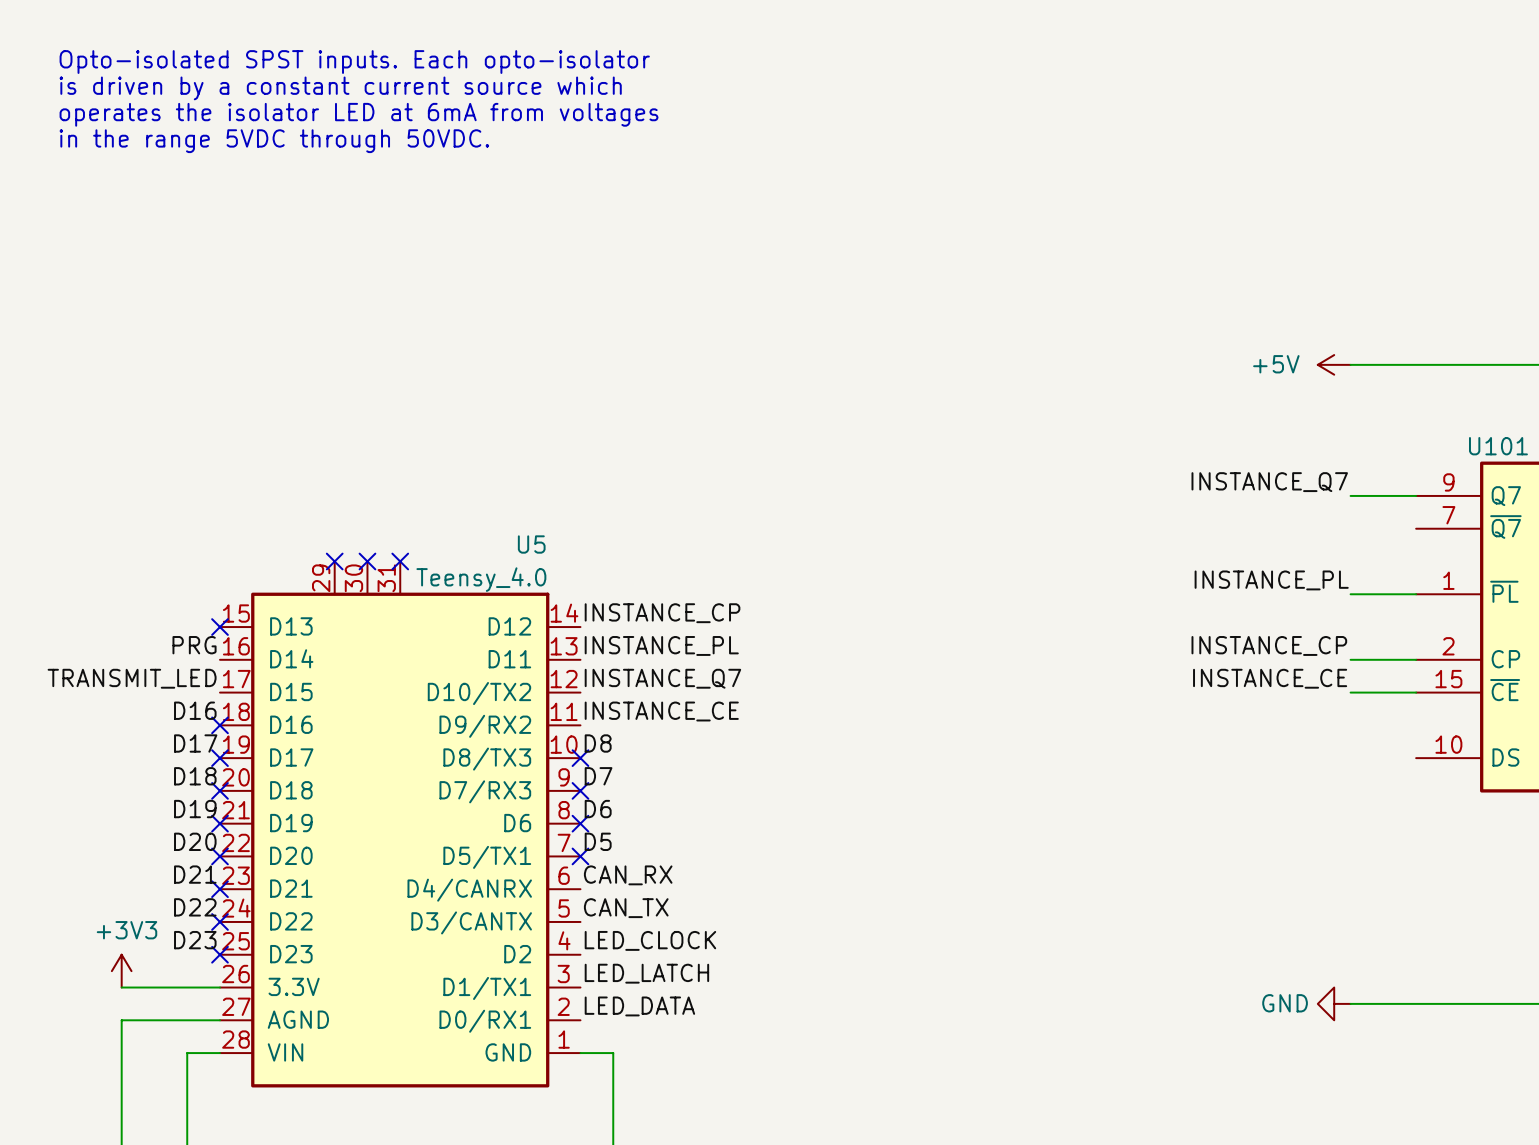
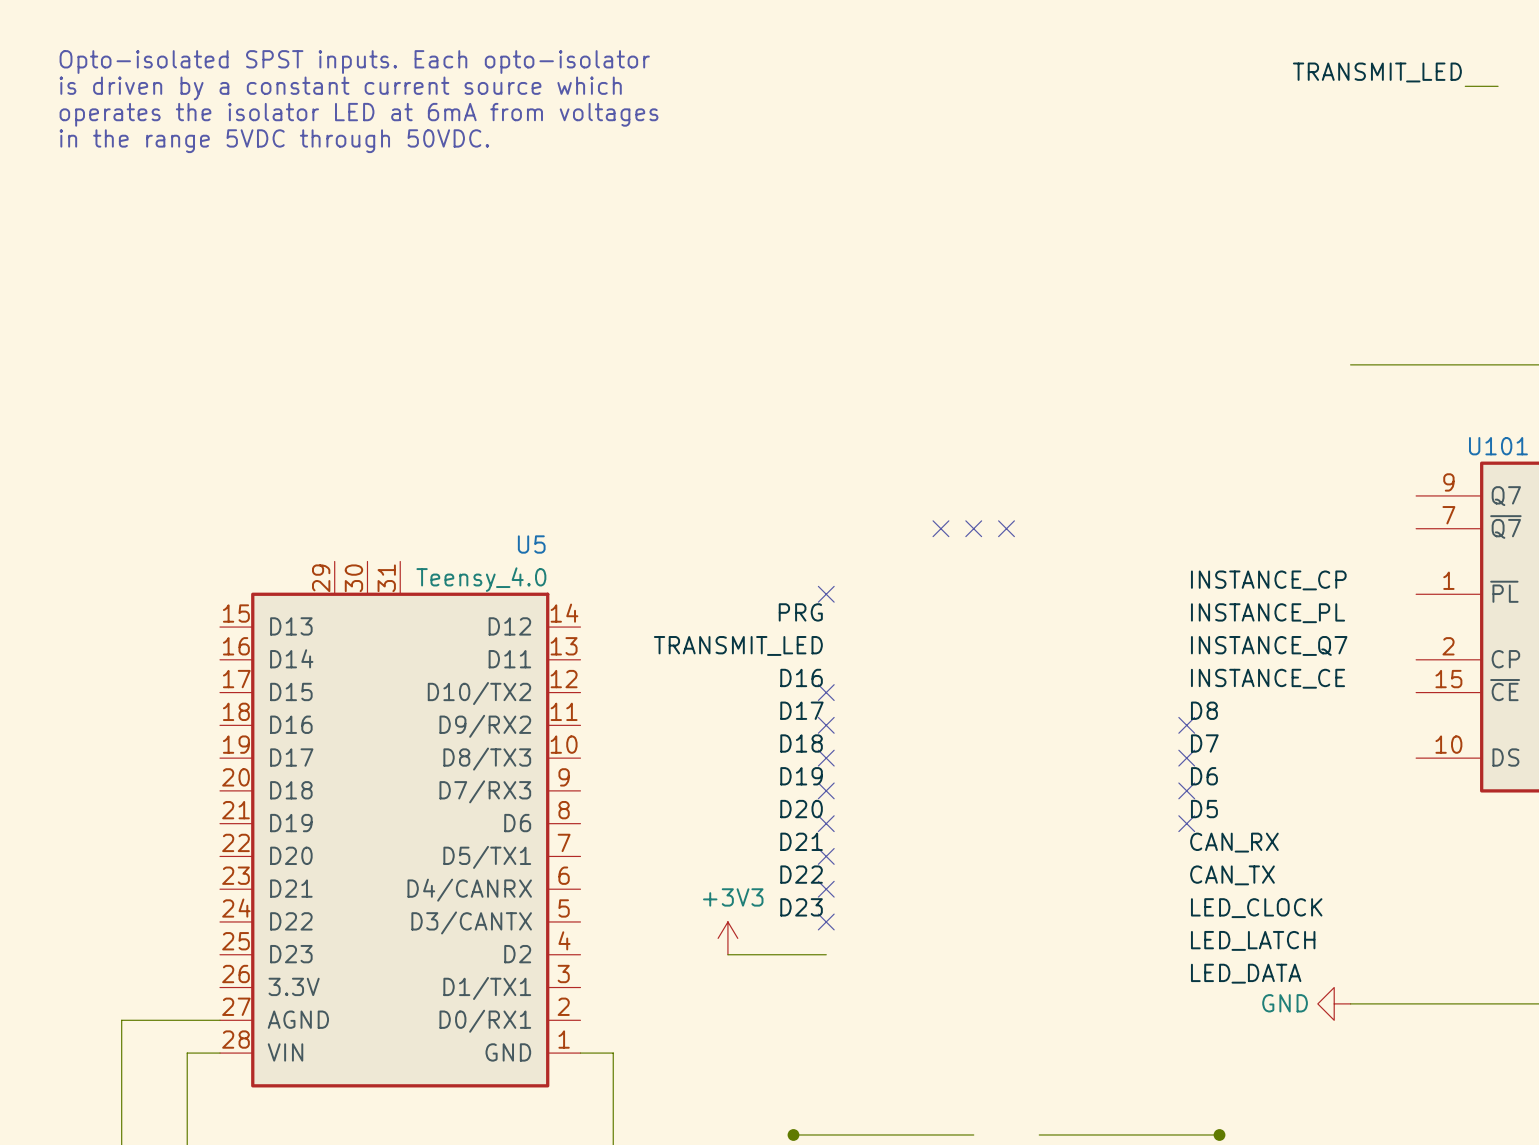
label: none -> TRANSMIT_LED (1377, 72)
wire: none -> (1465, 86) (1498, 86)
power symbol: +5V (1334, 364) -> none
label position: INSTANCE_Q7 (1269, 482) -> INSTANCE_Q7 (1269, 645)
wire: (1350, 495) (1416, 495) -> none
no-connect mark: none -> (940, 528)
no-connect mark: none -> (973, 528)
no-connect mark: none -> (1006, 528)
no-connect mark: (334, 561) -> none
no-connect mark: (367, 561) -> none
no-connect mark: (400, 561) -> none
label position: INSTANCE_PL (1271, 580) -> INSTANCE_PL (1268, 613)
no-connect mark: none -> (826, 594)
wire: (1350, 594) (1416, 594) -> none
label: none -> PRG (800, 612)
label: INSTANCE_CP (662, 613) -> none
no-connect mark: (220, 627) -> none
label: PRG (194, 645) -> none
label: INSTANCE_PL (661, 645) -> none
label: none -> TRANSMIT_LED (738, 645)
label position: INSTANCE_CP (1269, 645) -> INSTANCE_CP (1268, 580)
wire: (1350, 659) (1416, 659) -> none
label: none -> D16 (801, 677)
label: TRANSMIT_LED (132, 678) -> none
label: INSTANCE_Q7 (662, 678) -> none
label position: INSTANCE_CE (1270, 678) -> INSTANCE_CE (1268, 678)
no-connect mark: none -> (826, 692)
wire: (1350, 692) (1416, 692) -> none
label: D16 (195, 710) -> none
label: none -> D17 (801, 710)
label: none -> D8 (1204, 710)
label: INSTANCE_CE (661, 711) -> none
no-connect mark: (220, 725) -> none
no-connect mark: none -> (826, 725)
no-connect mark: none -> (1186, 725)
label: D17 (195, 743) -> none
label: D8 (598, 743) -> none
label: none -> D18 (801, 743)
label: none -> D7 (1204, 743)
no-connect mark: (220, 758) -> none
no-connect mark: (580, 758) -> none
no-connect mark: none -> (826, 758)
no-connect mark: none -> (1186, 758)
label: D18 (195, 776) -> none
label: D7 (598, 776) -> none
label: none -> D19 (801, 776)
label: none -> D6 (1204, 776)
no-connect mark: (220, 790) -> none
no-connect mark: (580, 790) -> none
no-connect mark: none -> (826, 790)
no-connect mark: none -> (1186, 790)
label: D19 (195, 809) -> none
label: D6 (598, 809) -> none
label: none -> D20 (801, 809)
label: none -> D5 (1204, 809)
no-connect mark: (220, 823) -> none
no-connect mark: (580, 823) -> none
no-connect mark: none -> (826, 823)
no-connect mark: none -> (1186, 823)
label: D20 (195, 841) -> none
label: D5 (598, 841) -> none
label: none -> D21 (801, 841)
label: none -> CAN_RX (1234, 842)
no-connect mark: (220, 856) -> none
no-connect mark: (580, 856) -> none
no-connect mark: none -> (826, 856)
label: D21 (195, 874) -> none
label: none -> D22 (801, 874)
label: CAN_RX (628, 875) -> none
label: none -> CAN_TX (1232, 875)
no-connect mark: (220, 889) -> none
no-connect mark: none -> (826, 889)
label: D22 (195, 907) -> none
label: none -> D23 (801, 907)
label: CAN_TX (626, 908) -> none
label: none -> LED_CLOCK (1256, 908)
no-connect mark: (220, 921) -> none
no-connect mark: none -> (826, 921)
power symbol: none -> +3V3 (727, 938)
label: D23 (195, 940) -> none
label: LED_CLOCK (650, 940) -> none
label: none -> LED_LATCH (1253, 940)
no-connect mark: (220, 954) -> none
wire: none -> (727, 954) (826, 954)
power symbol: +3V3 (121, 971) -> none
label: LED_LATCH (646, 973) -> none
label: none -> LED_DATA (1246, 973)
wire: (121, 987) (220, 987) -> none
label: LED_DATA (639, 1006) -> none
wire: none -> (793, 1134) (973, 1134)
junction: none -> (793, 1134)
wire: none -> (1039, 1134) (1219, 1134)
junction: none -> (1219, 1134)

